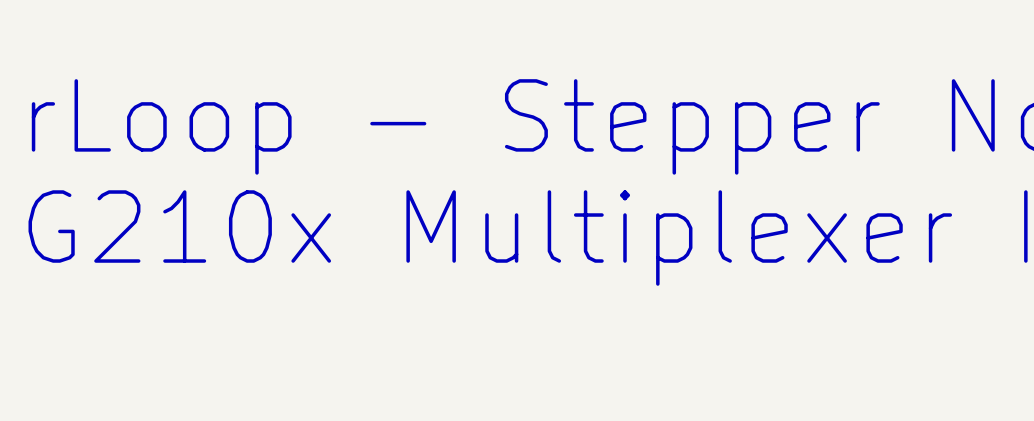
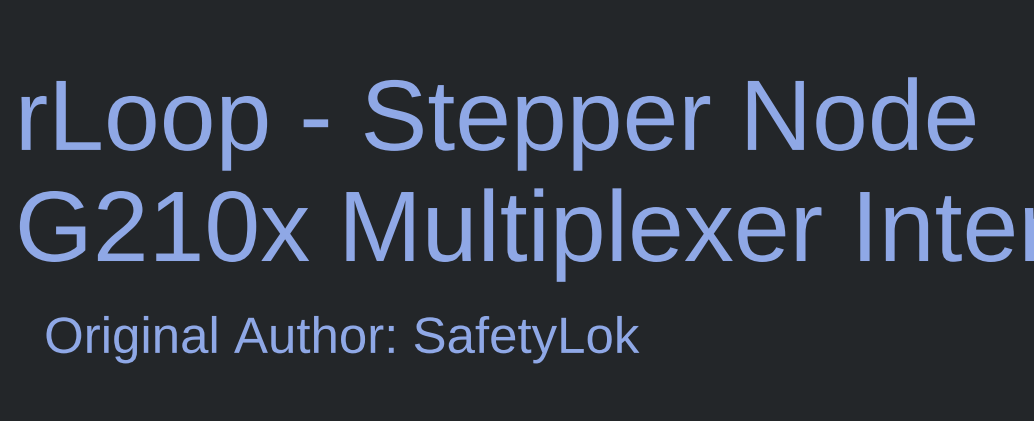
text: none -> Original Author: SafetyLok (342, 339)

